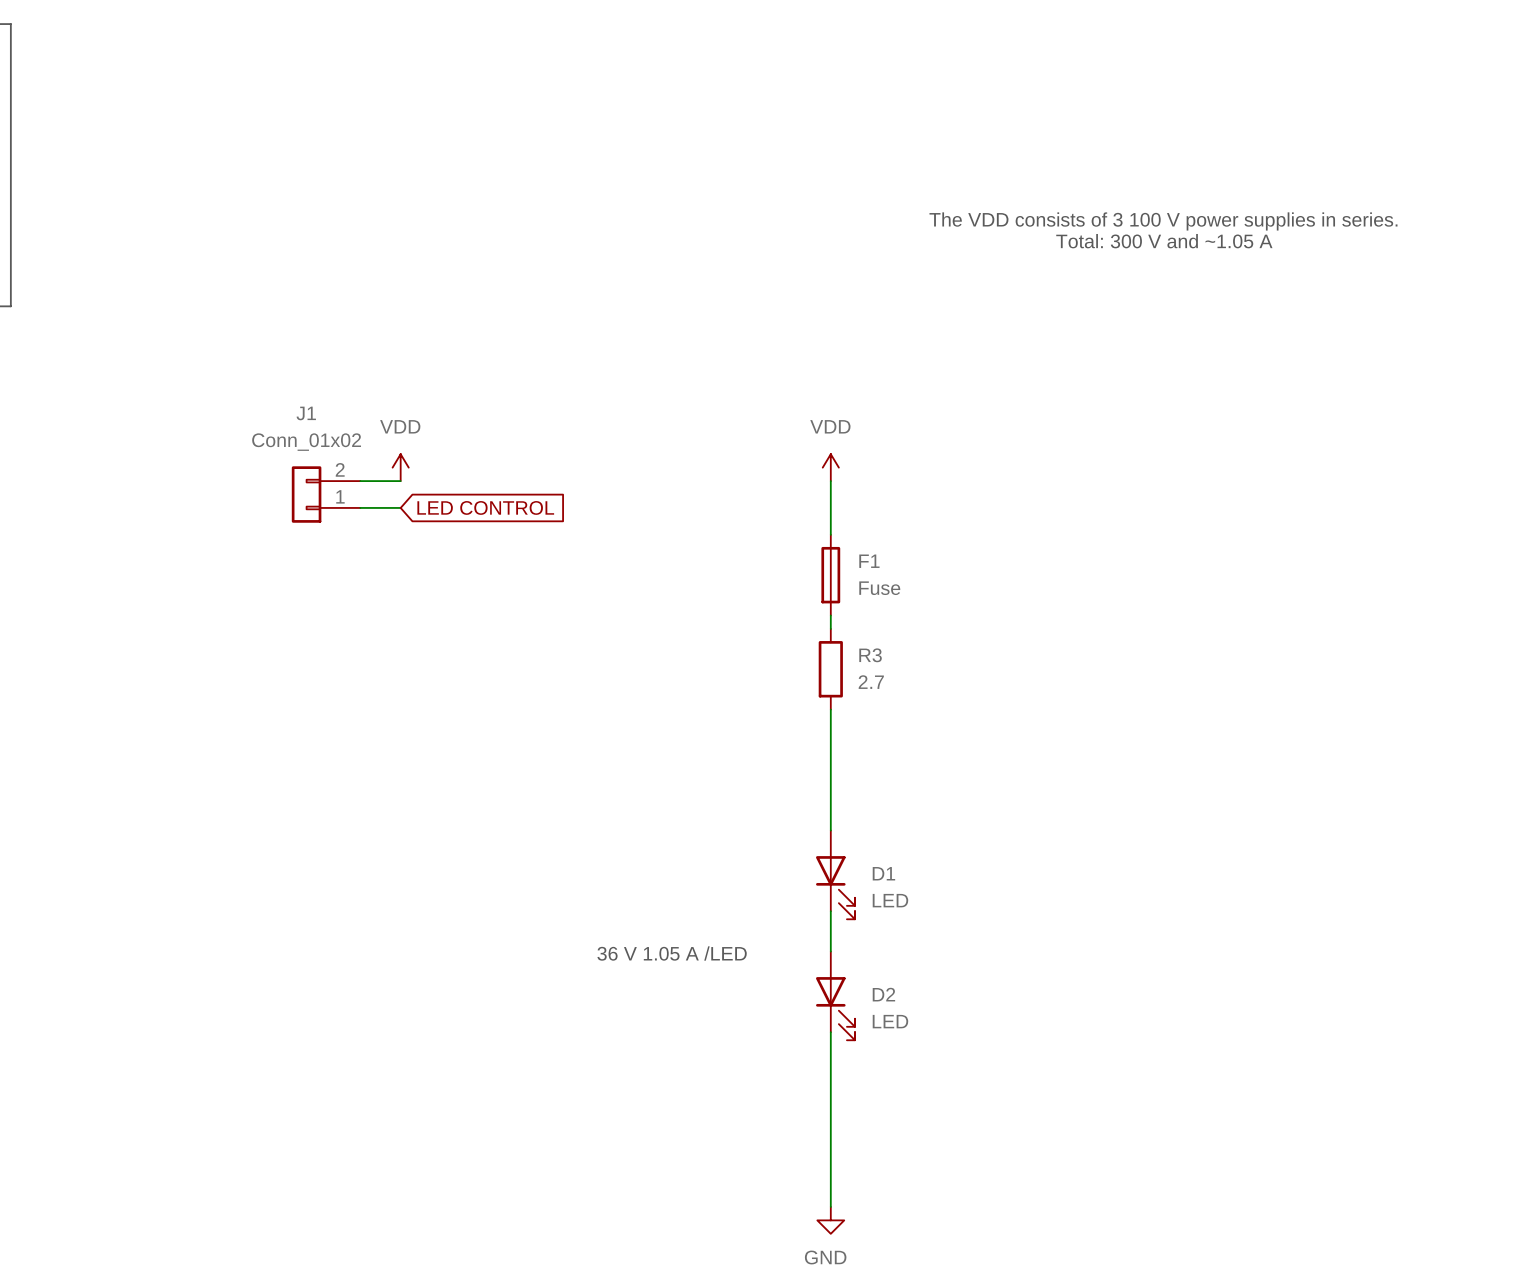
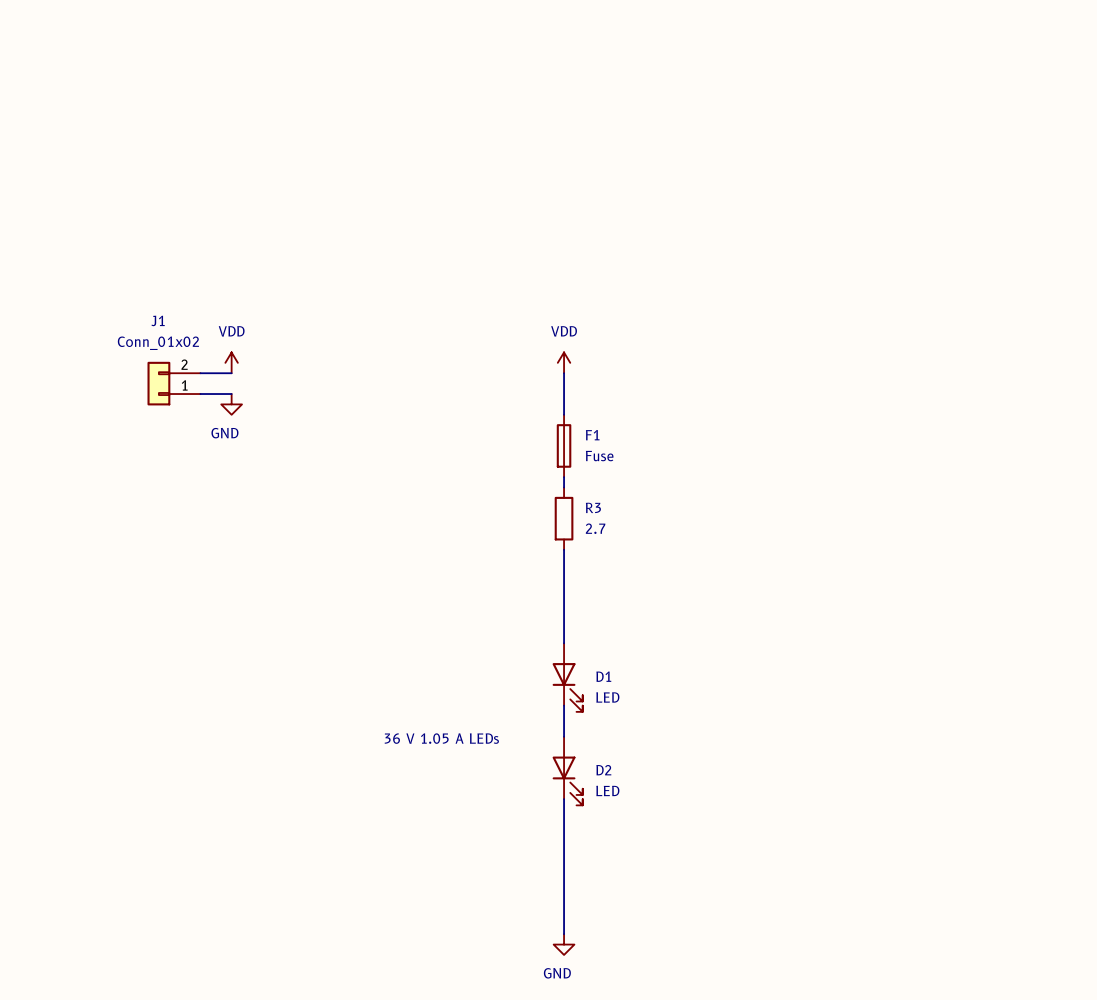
text: The VDD consists of 3 100 V power supplies in series. (1163, 221) -> none
text: Total: 300 V and ~1.05 A (1164, 241) -> none
global label: LED CONTROL (485, 507) -> none
power symbol: none -> GND (231, 404)
text: 36 V 1.05 A /LED (672, 953) -> 36 V 1.05 A LEDs (441, 738)

